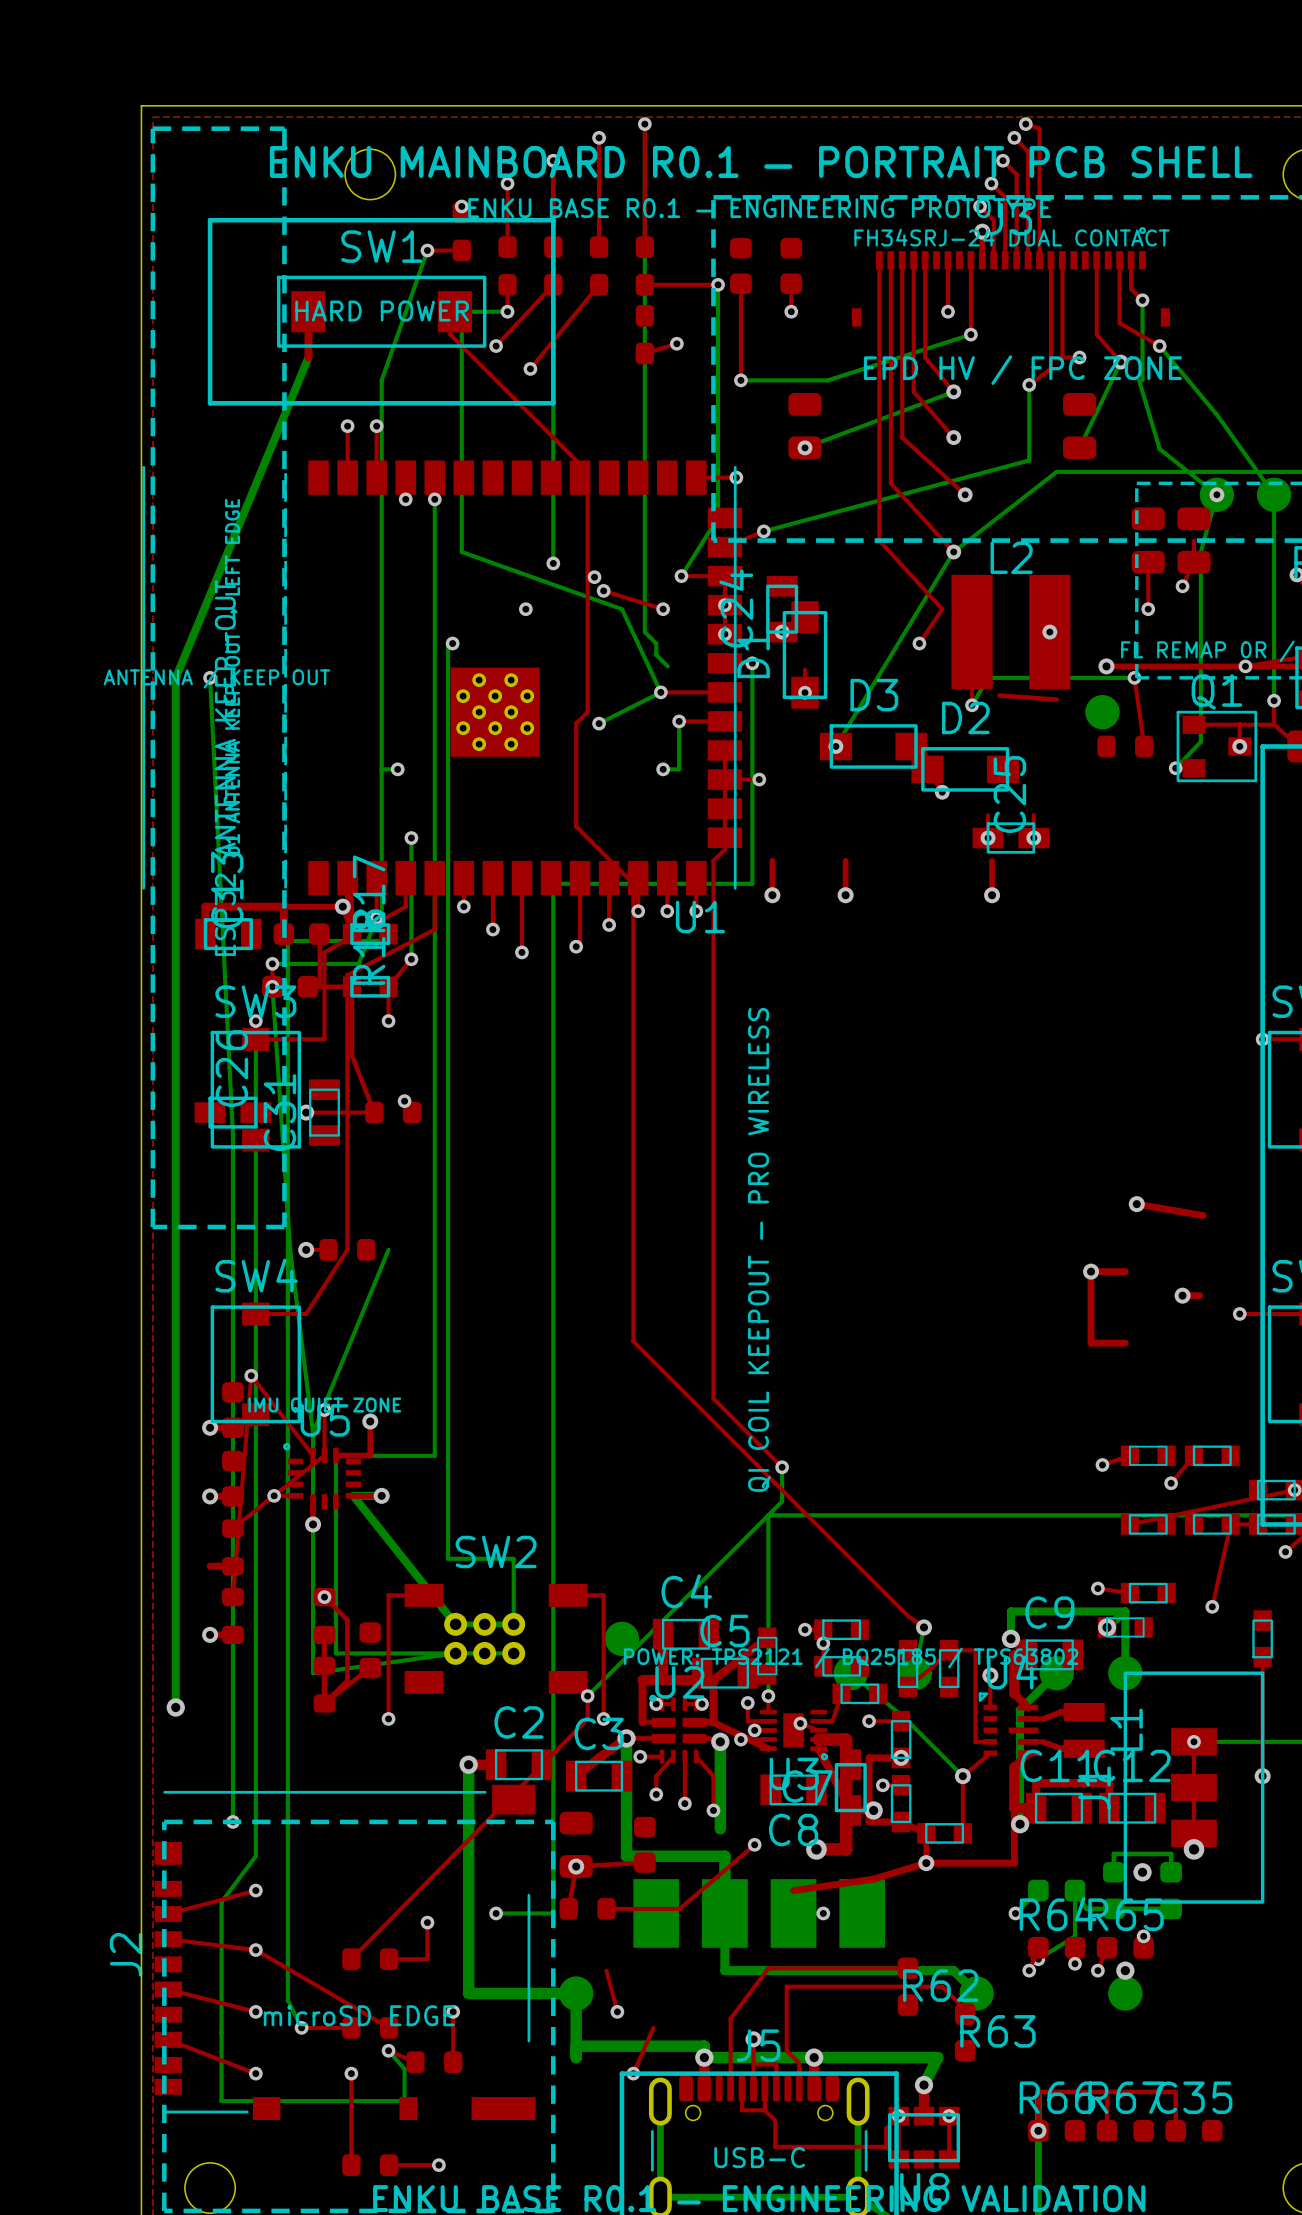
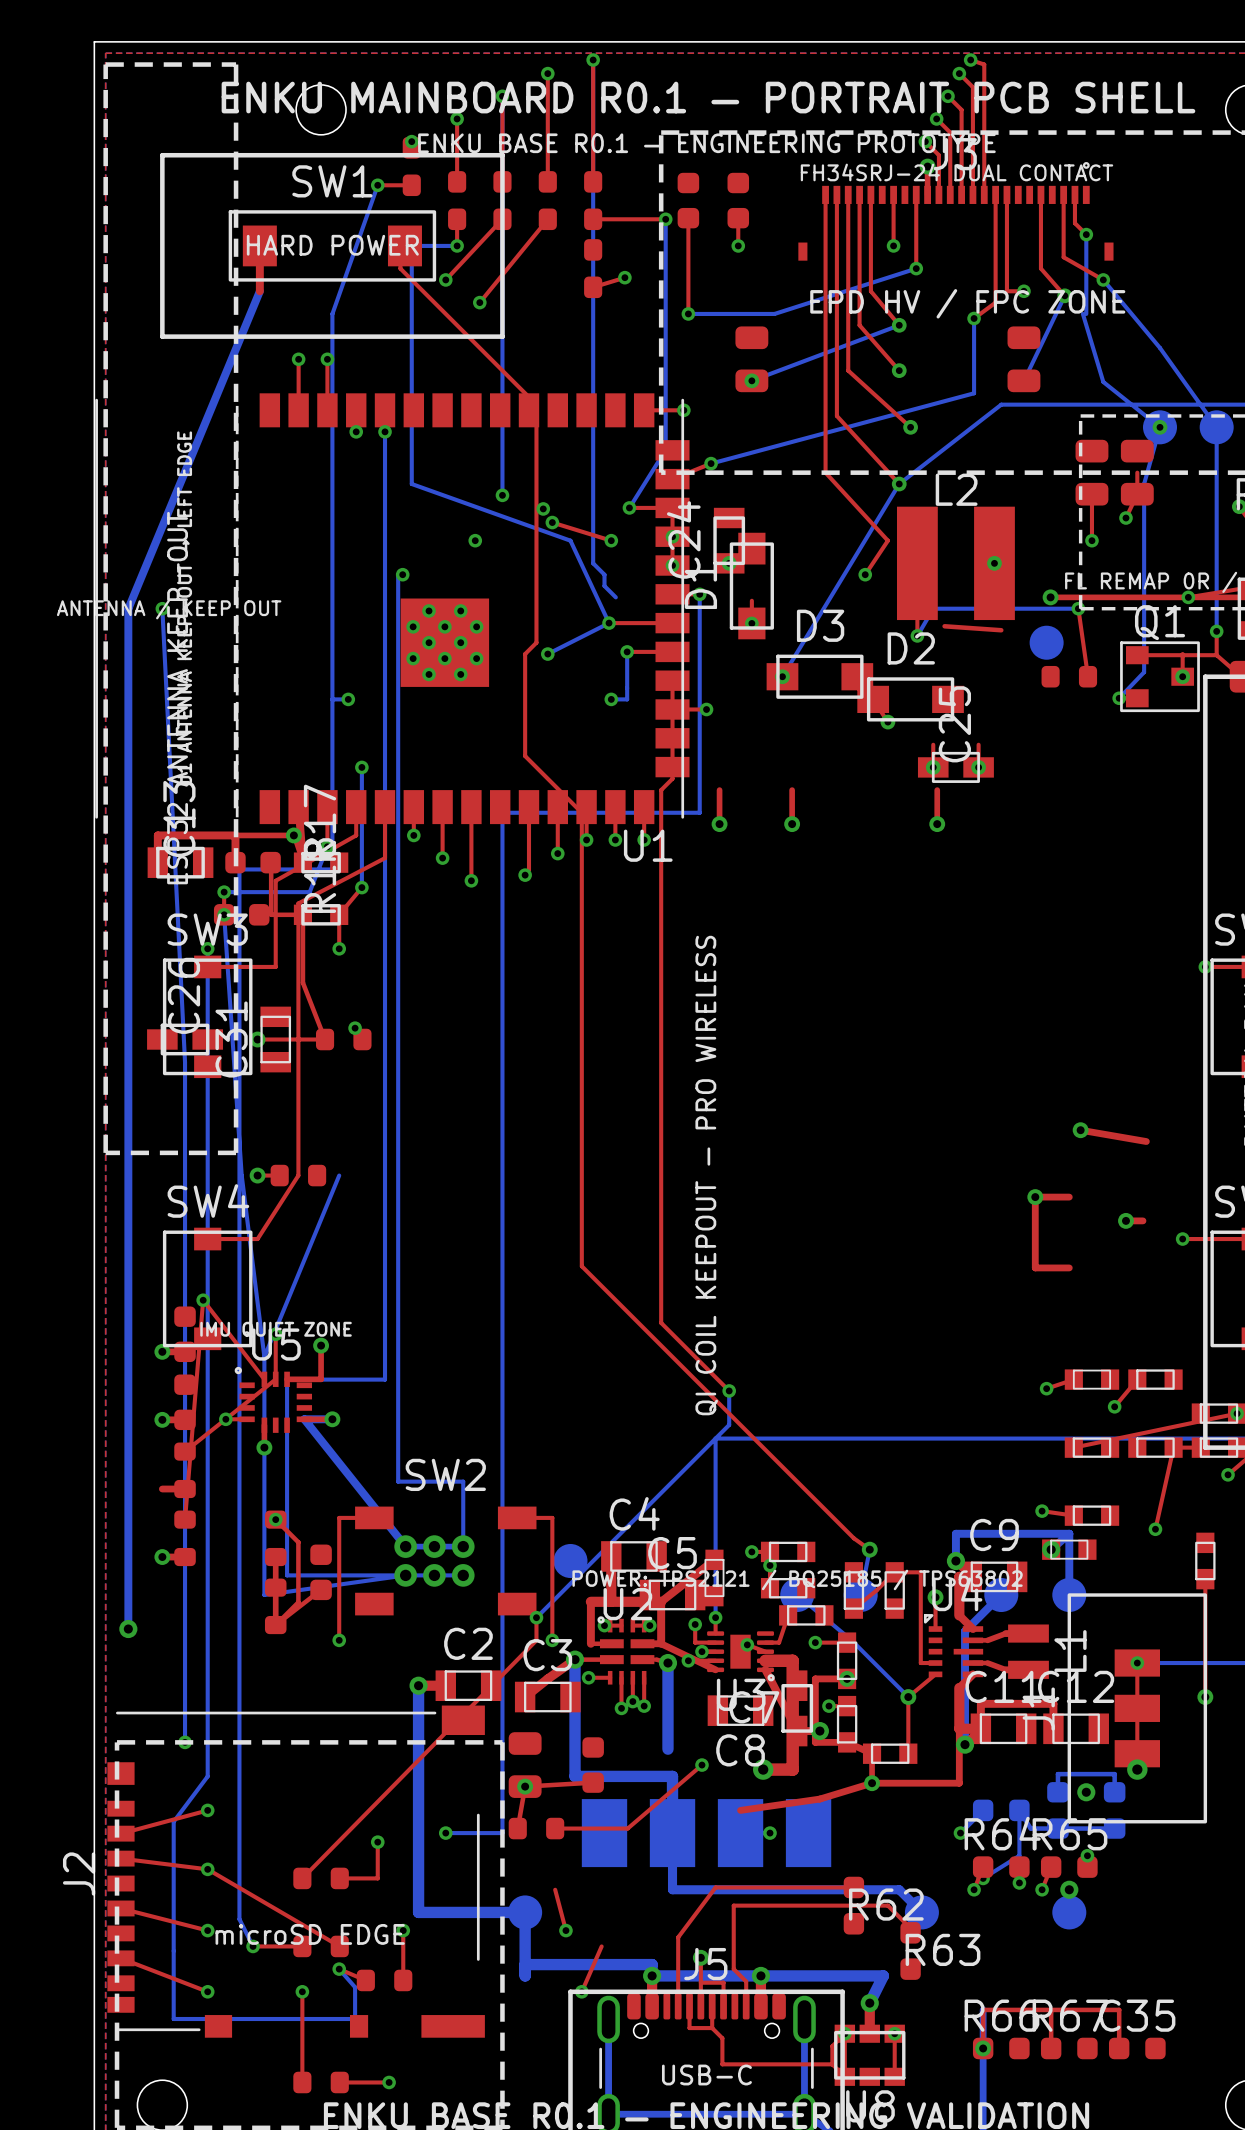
top track: (673, 1756) (656, 1776) (656, 1794) -> (621, 1677) (621, 1708)
top track: (696, 1756) (713, 1776) (713, 1810) -> (644, 1677) (644, 1706)
top track: (684, 1780) (684, 1803) -> none
via: none -> (632, 1701)
via: none -> (644, 1706)
via: none -> (621, 1708)
via: (656, 1794) -> none
via: (684, 1803) -> none
via: (713, 1810) -> none

